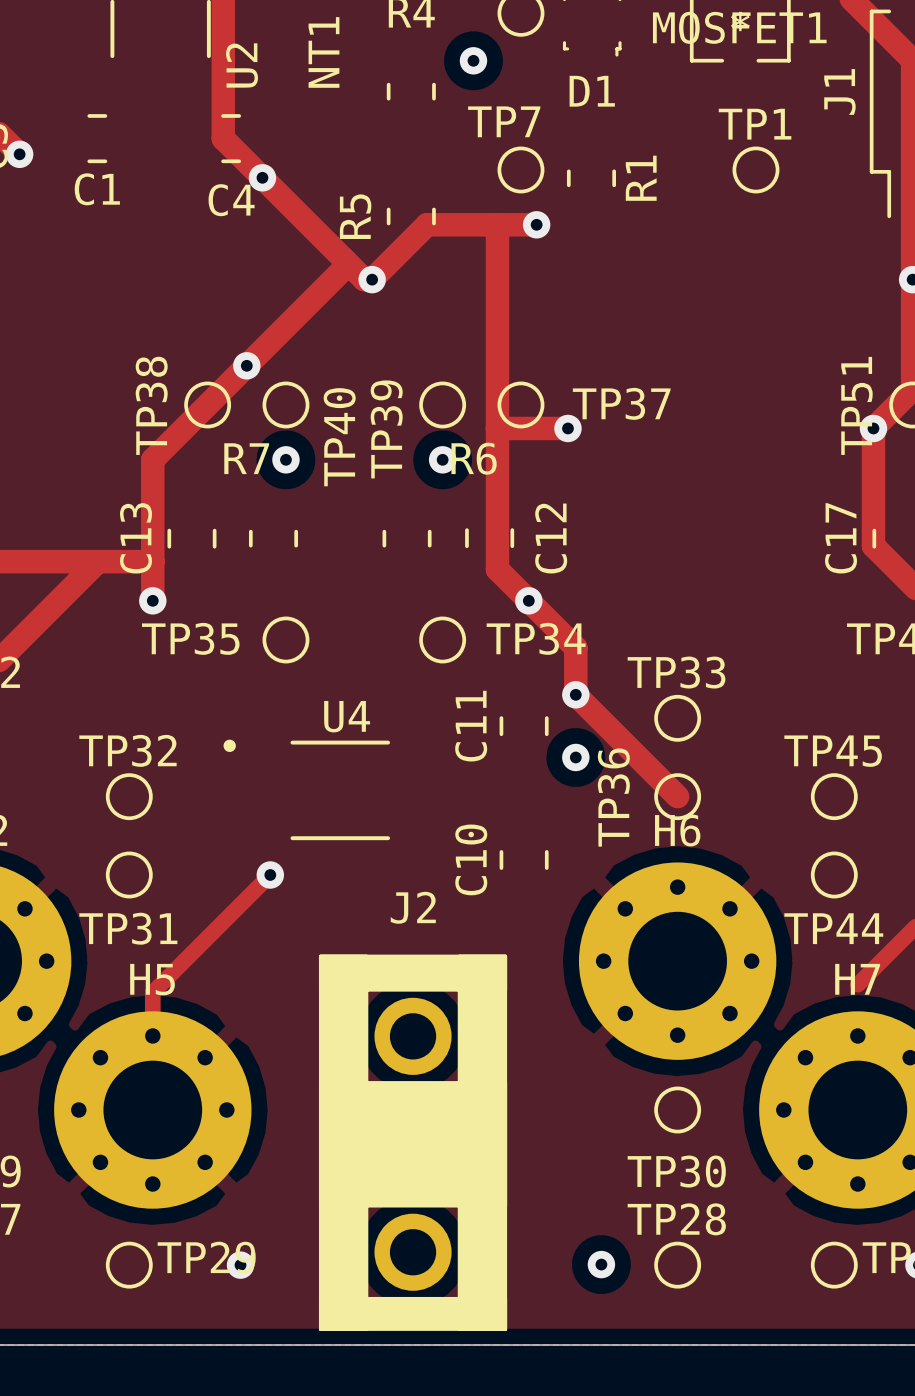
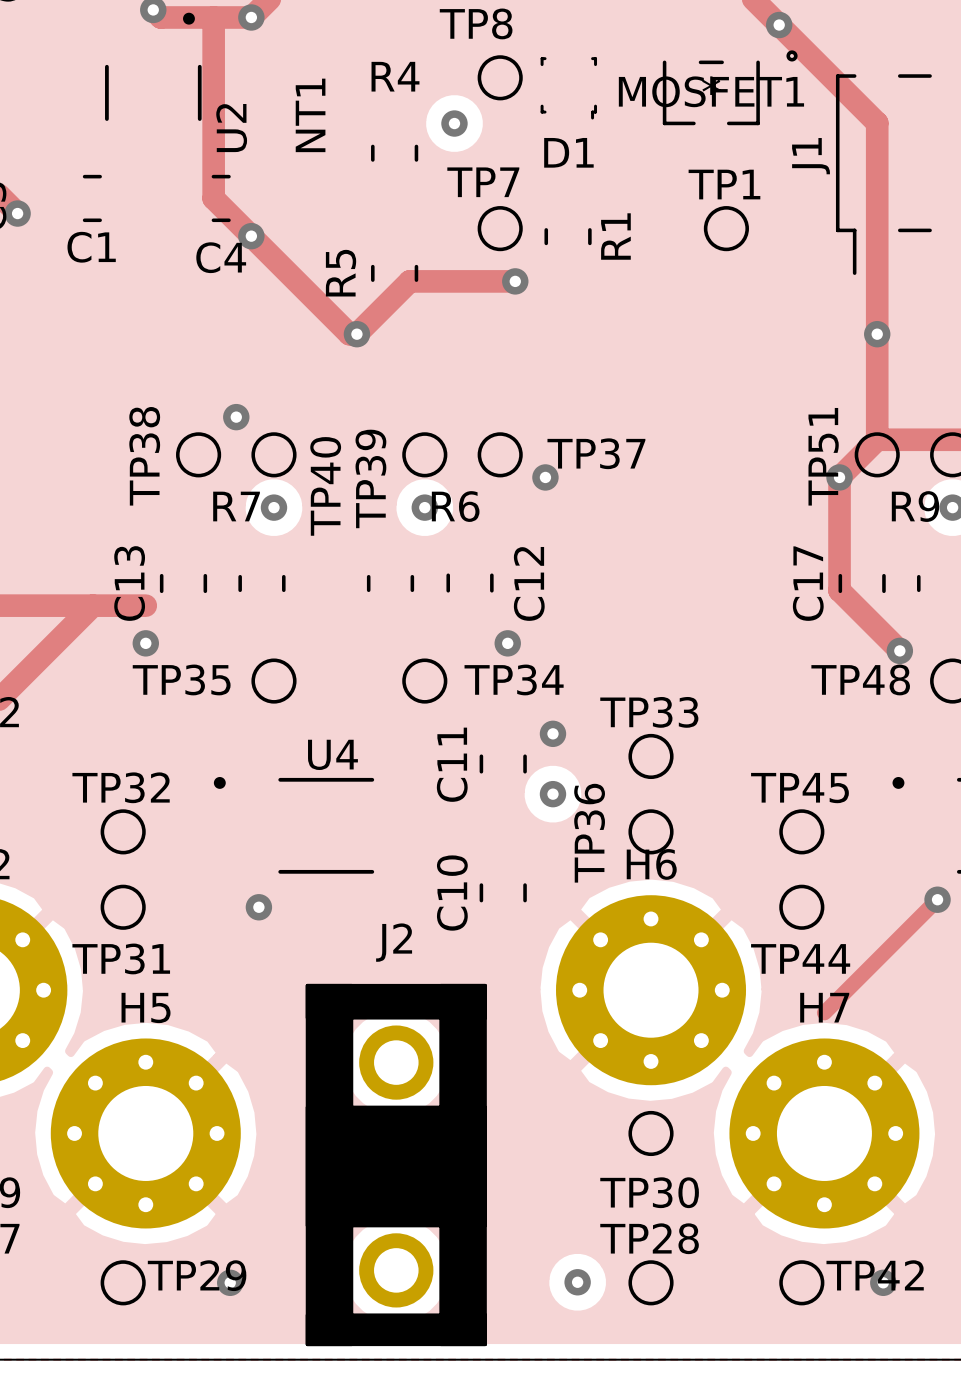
track: (497, 224) (497, 569) (575, 647) (575, 694) (677, 796) -> none
track: (344, 260) (344, 267) (152, 459) (152, 600) -> none
track: (497, 428) (567, 428) -> none
track: (270, 874) (152, 992) (152, 1110) -> none

